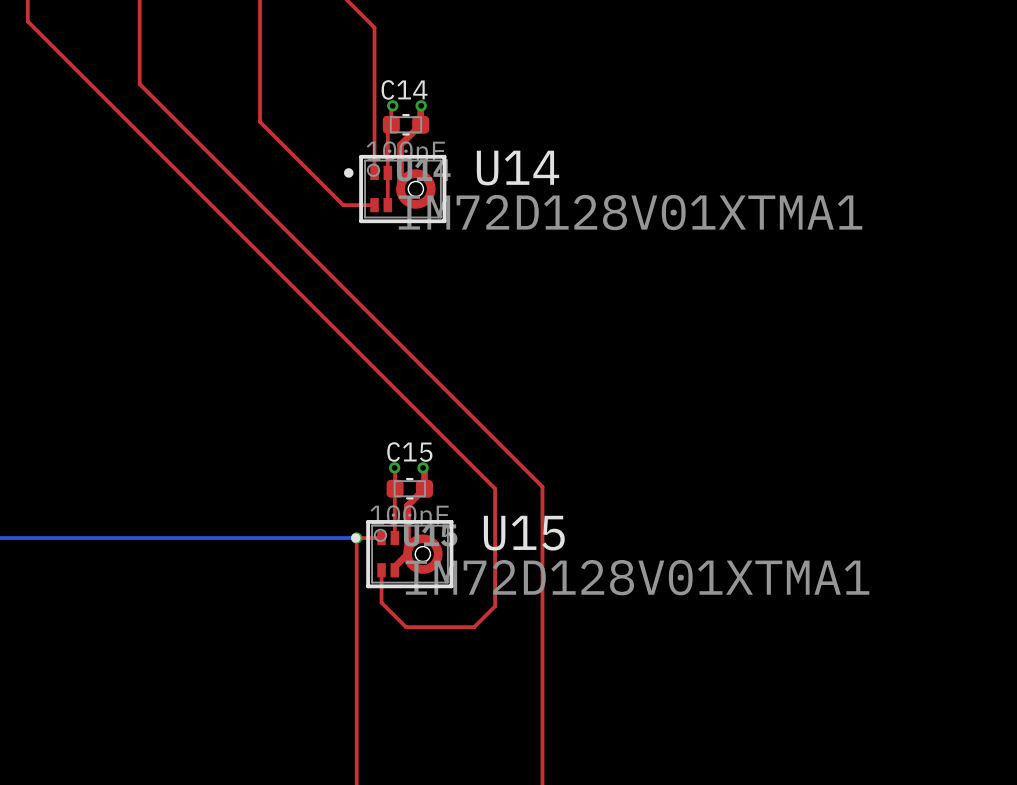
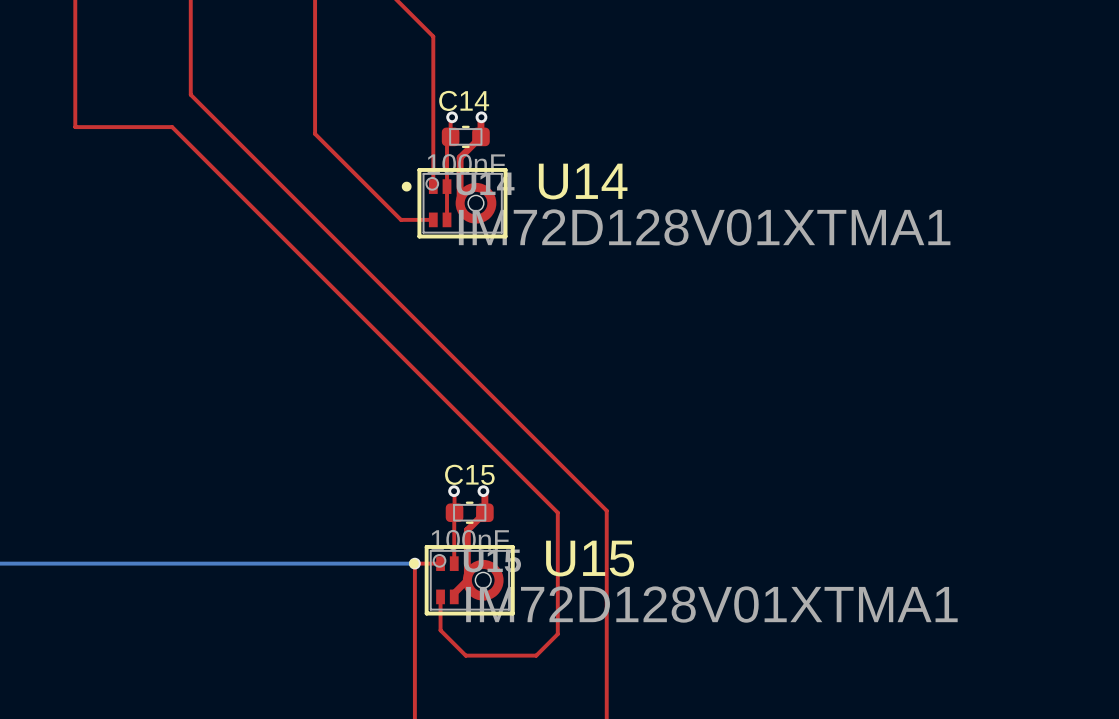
top track: (27, 21) (121, 115) -> (75, 30) (75, 127) (172, 127)

